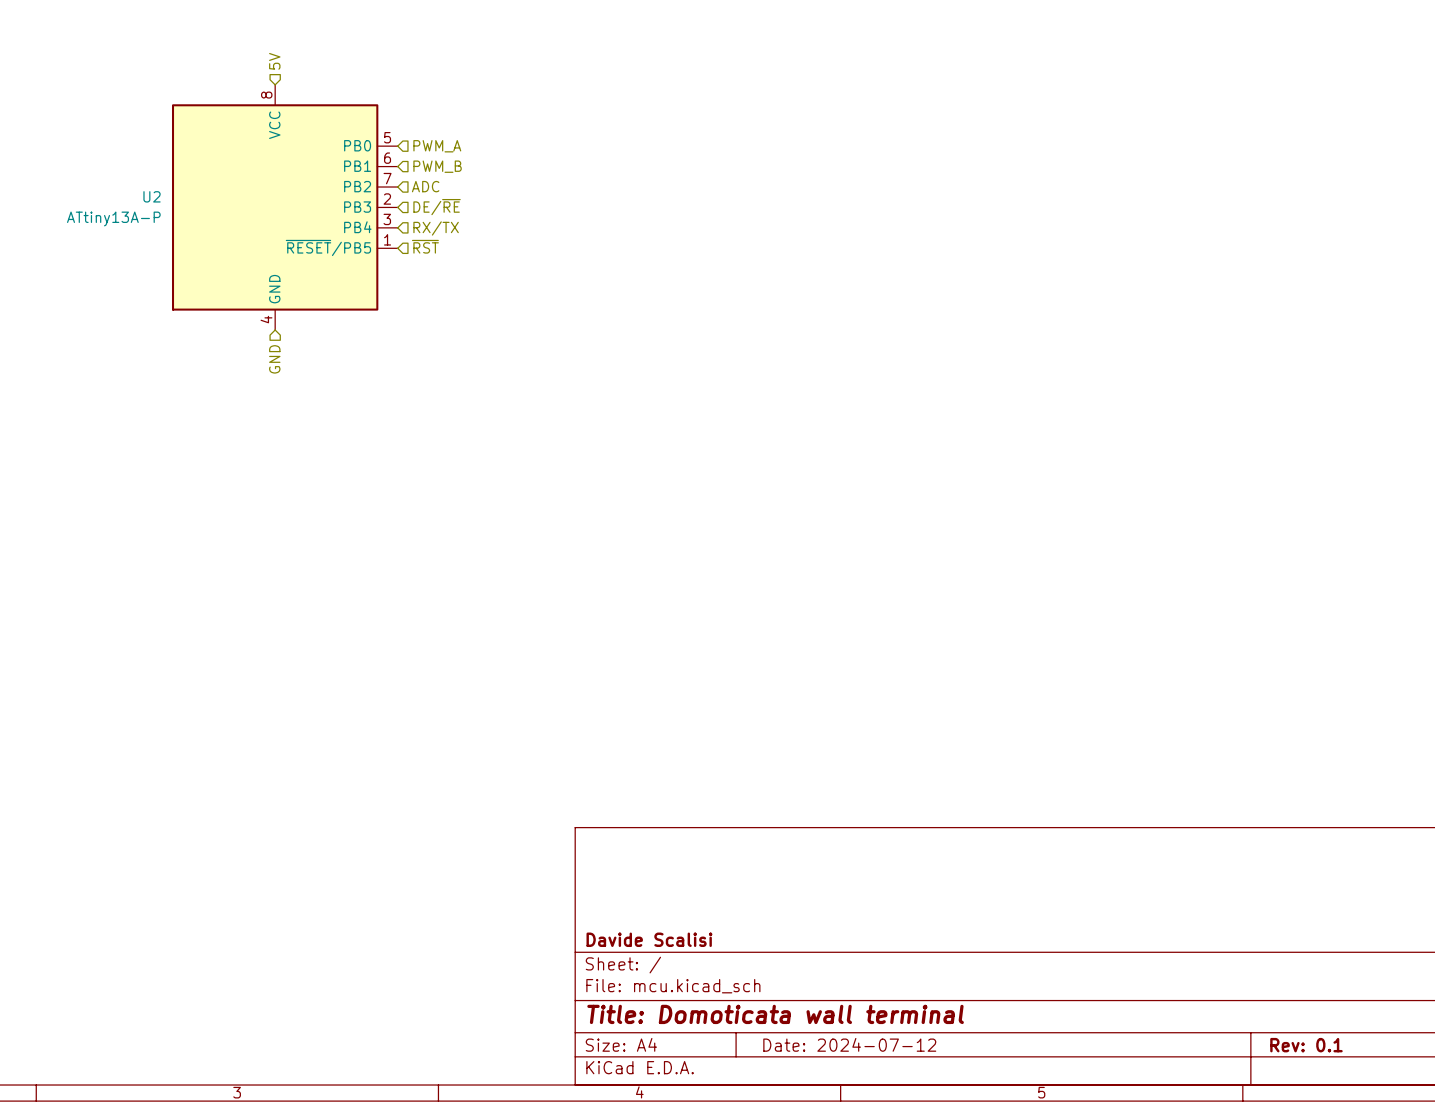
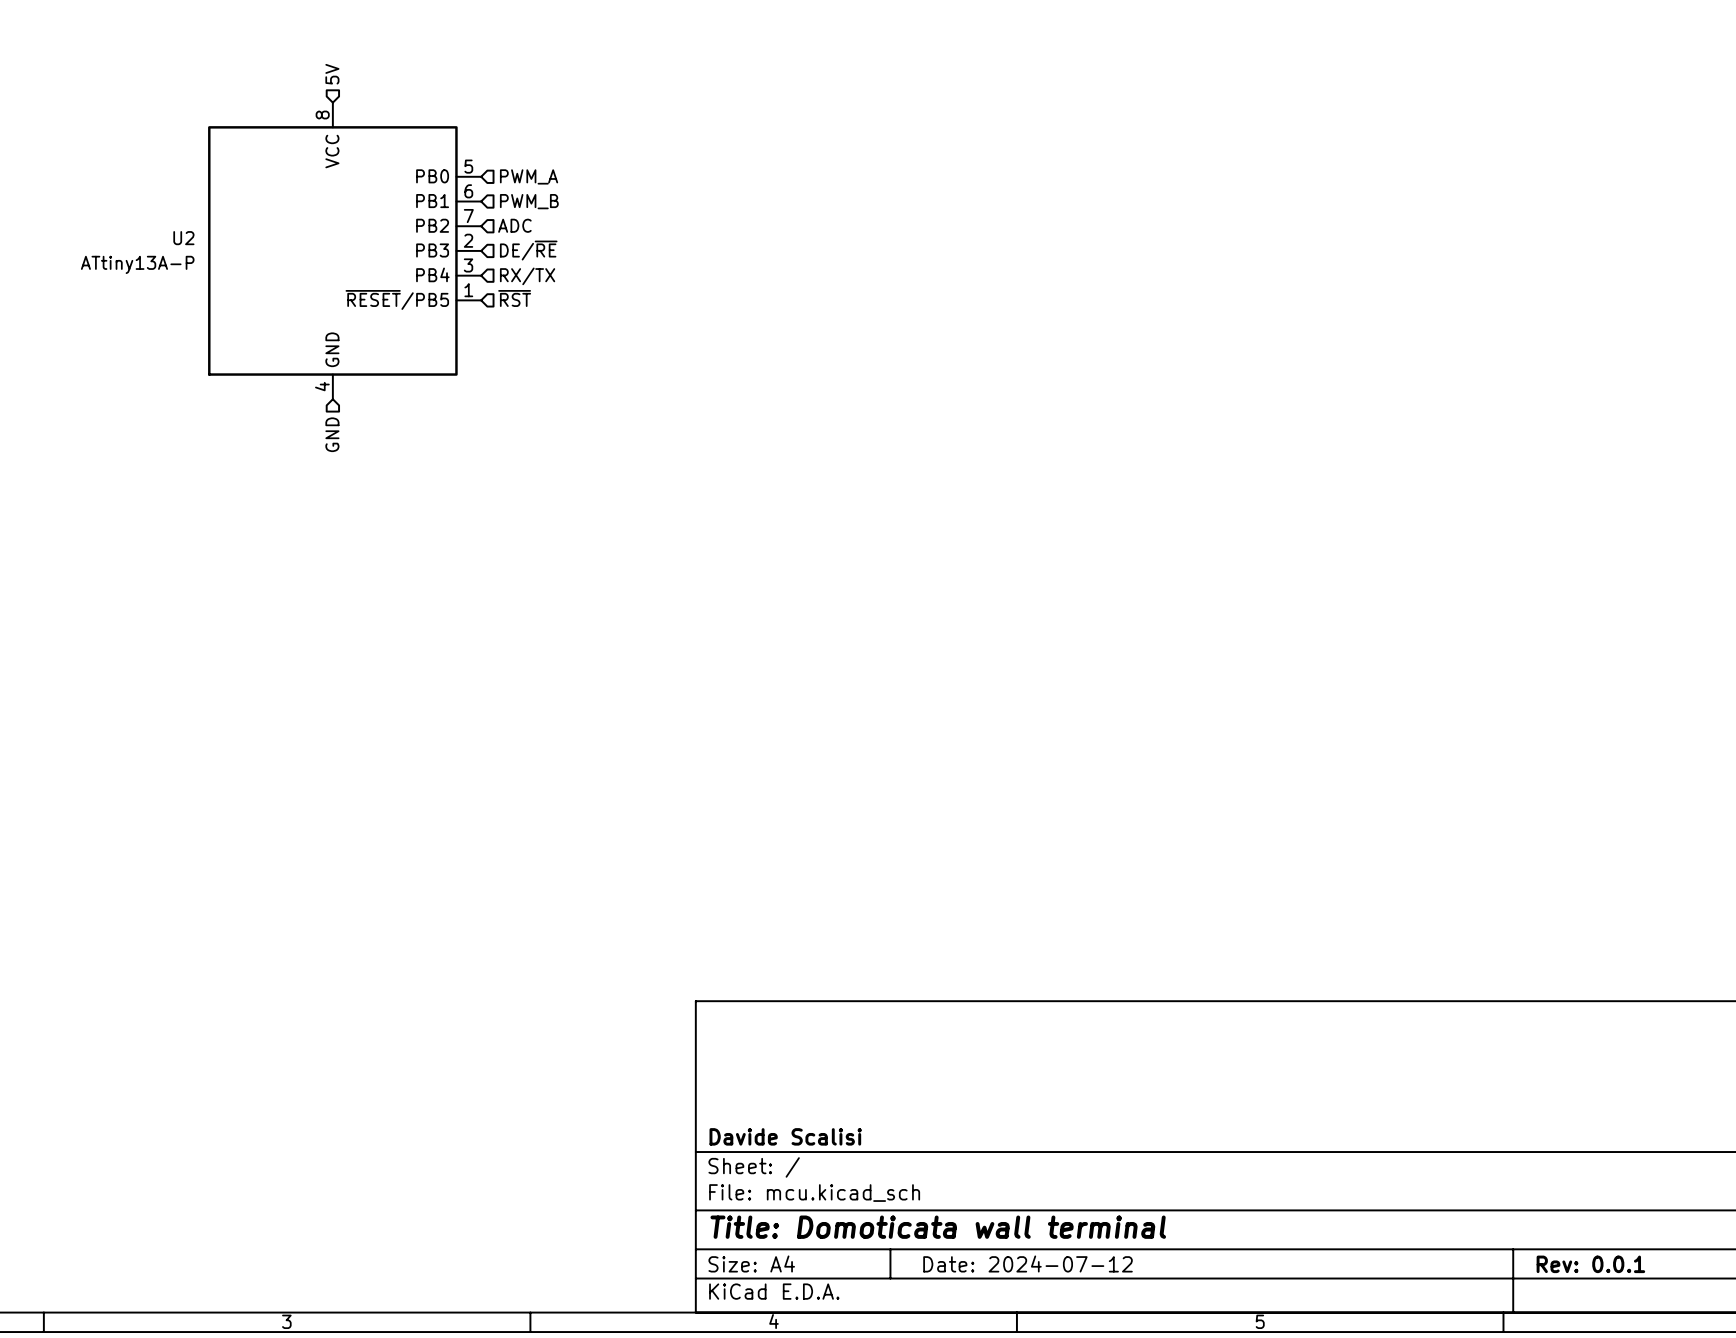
title block: Rev: 0.1 (1306, 1045) -> Rev: 0.0.1 (1590, 1264)

